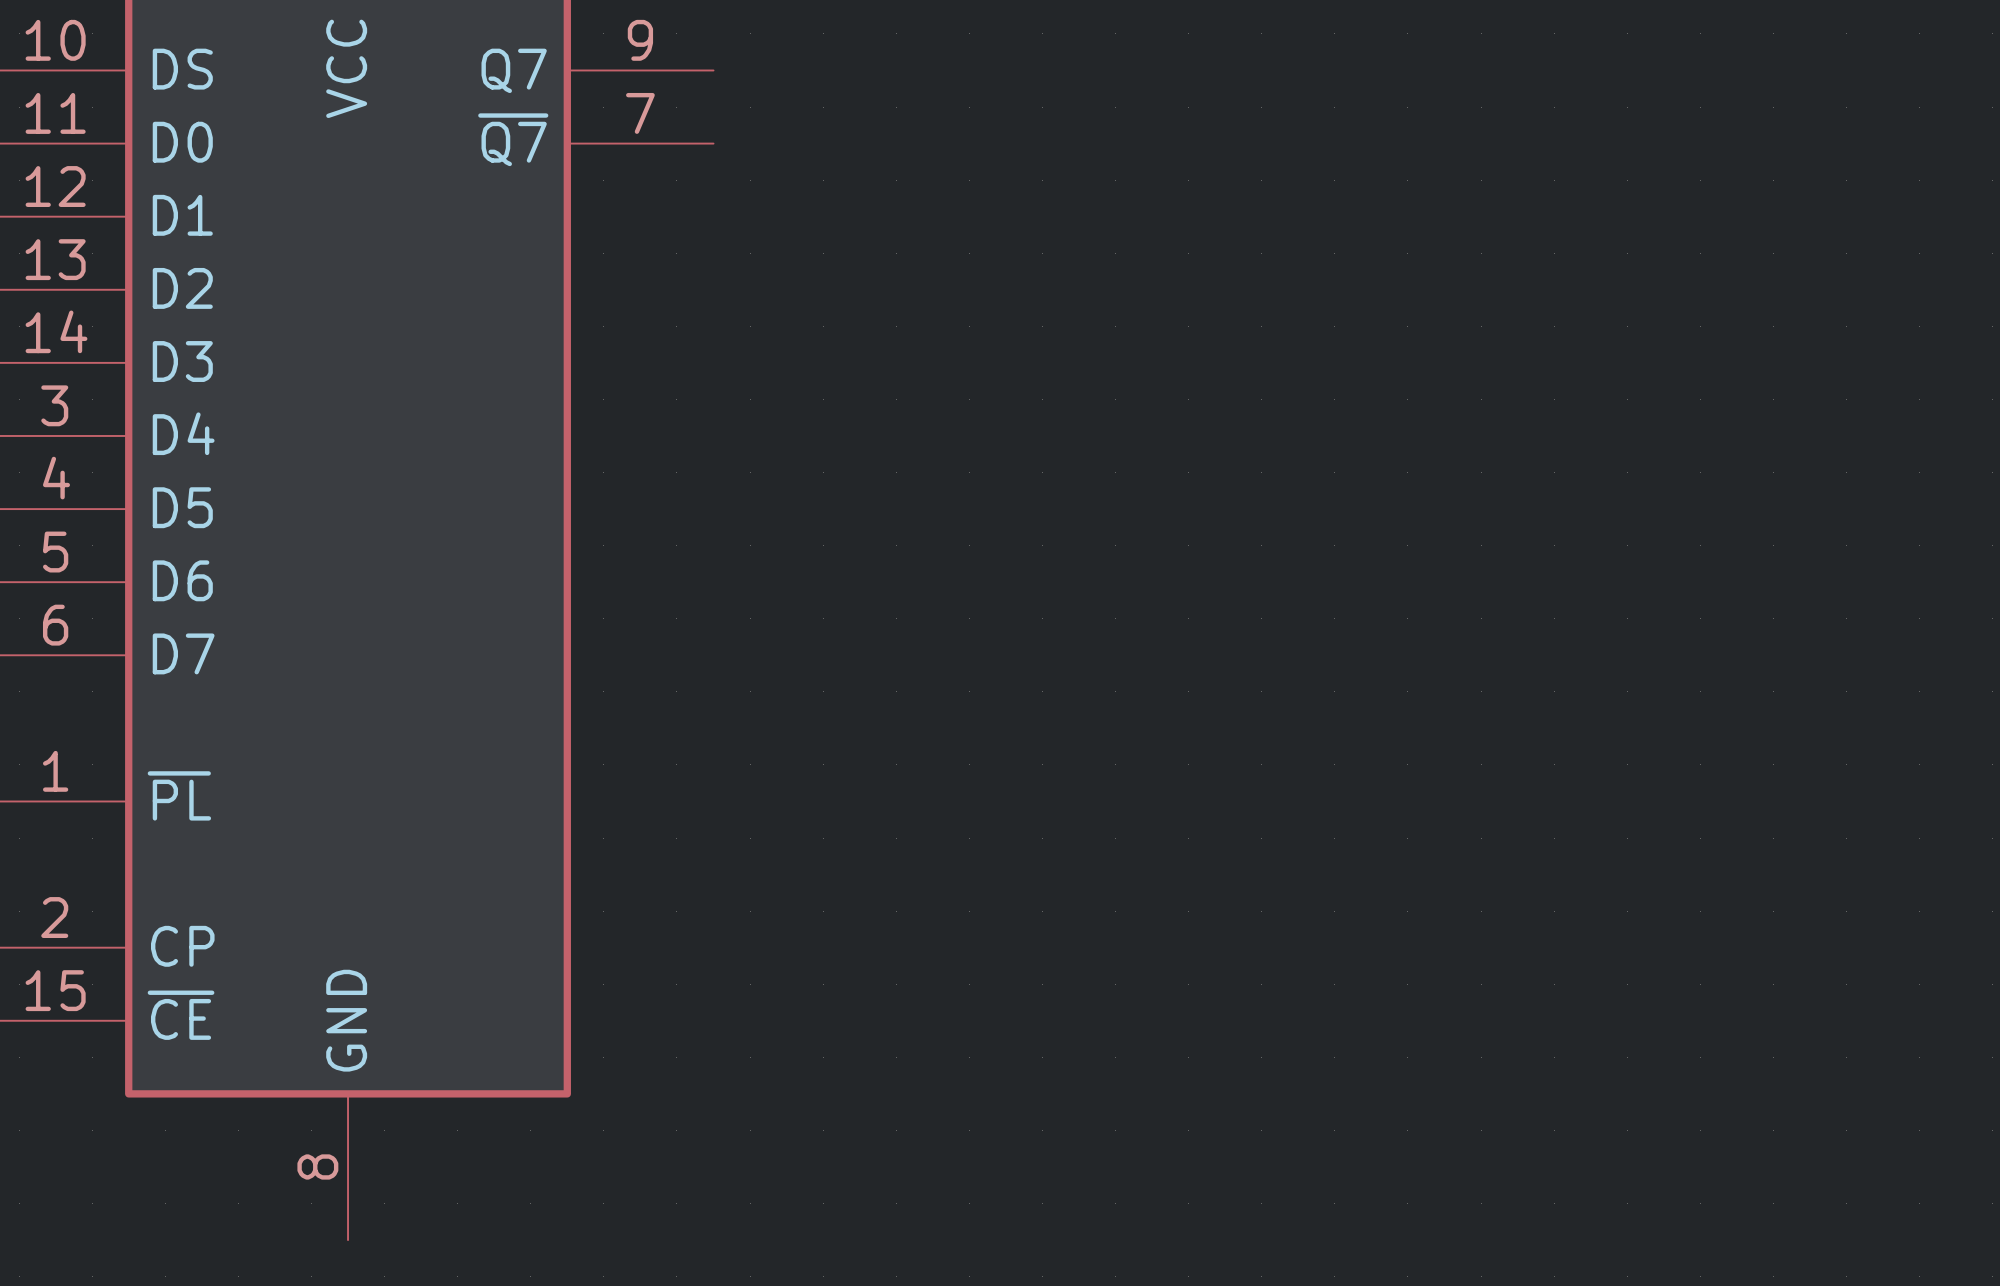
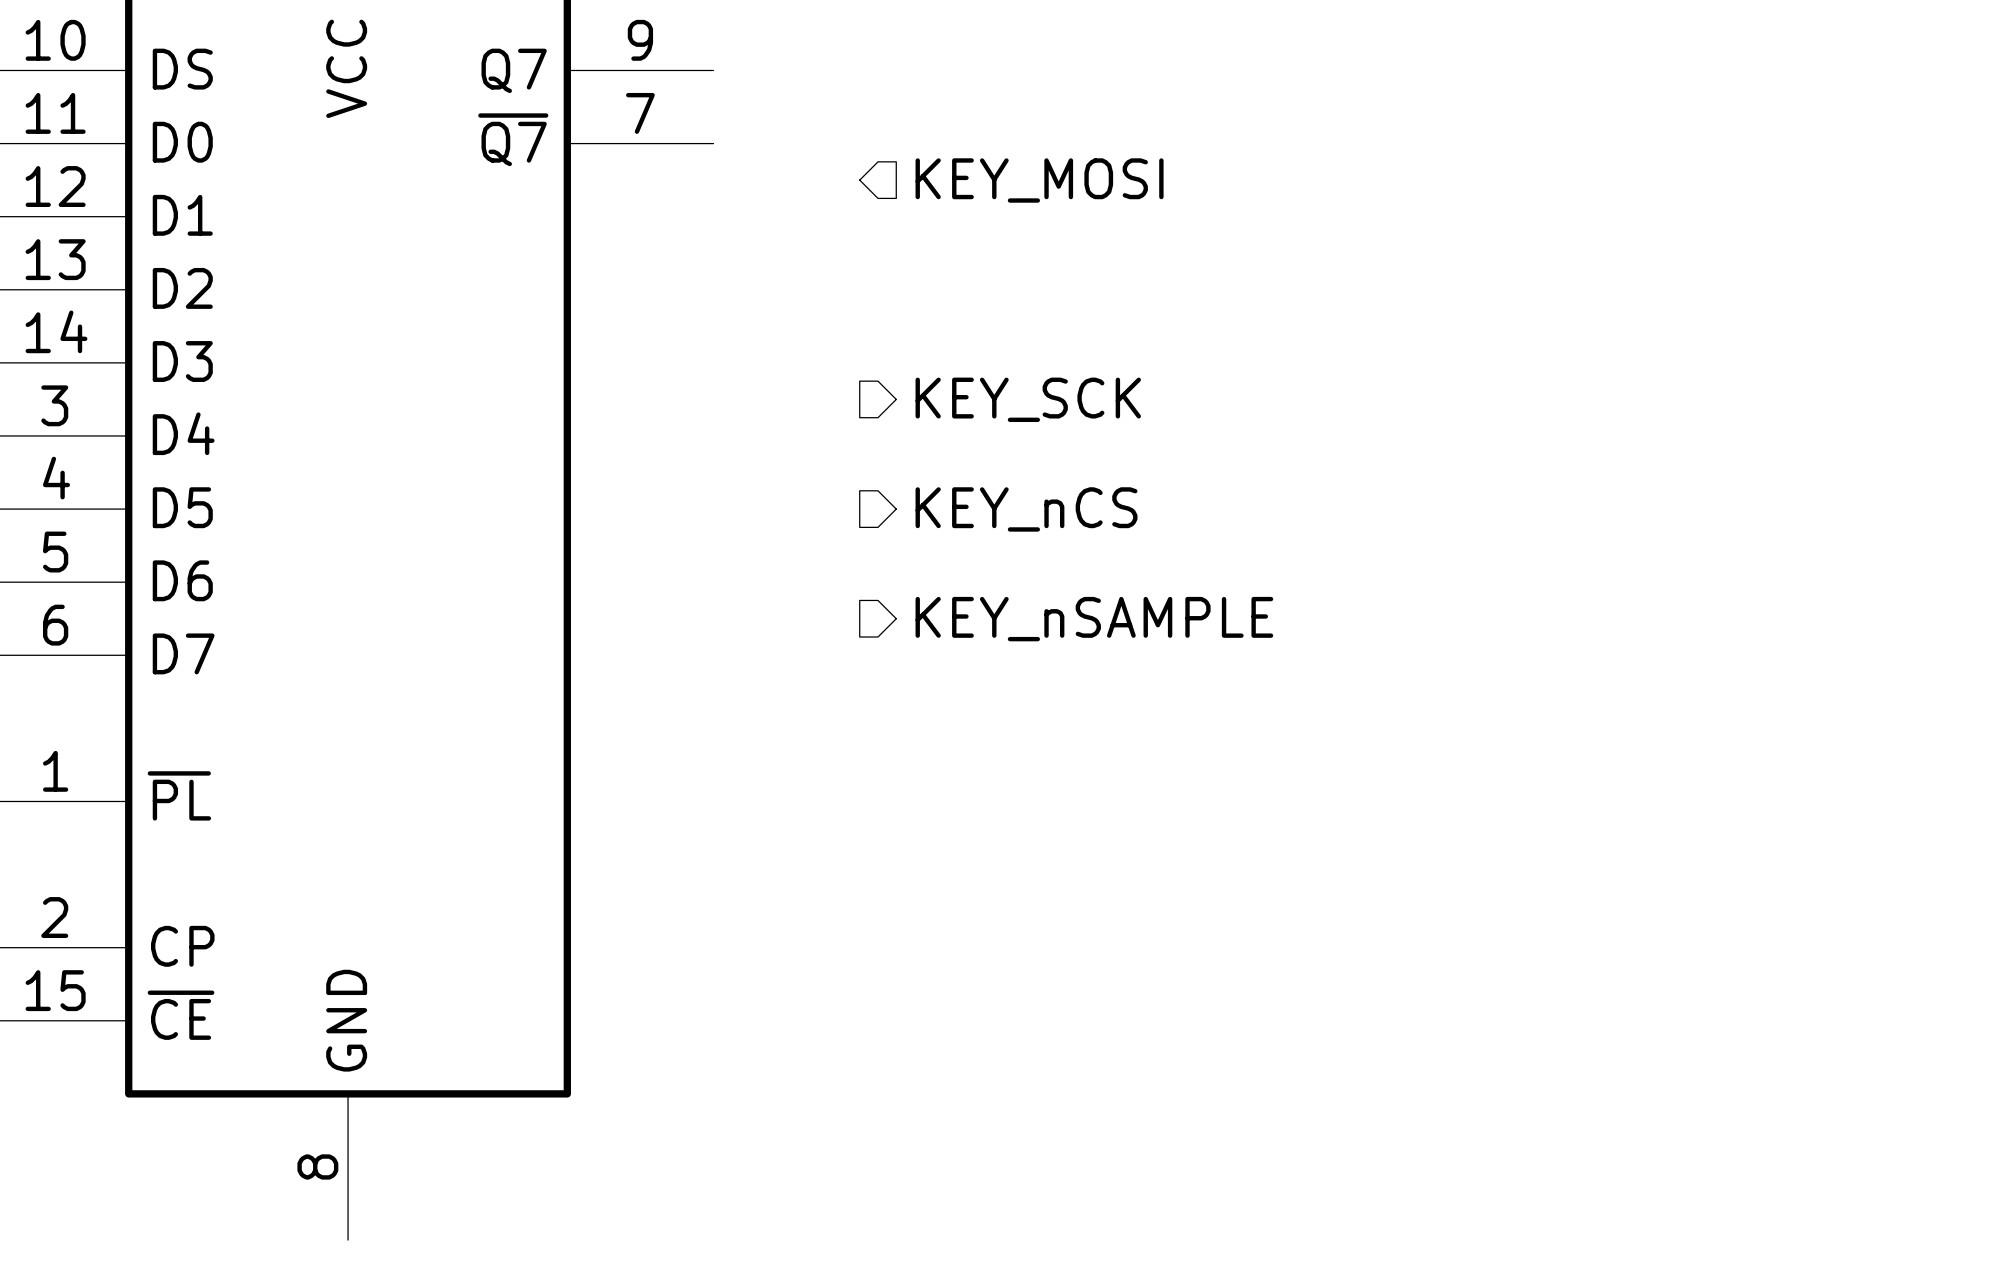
hierarchical label: none -> KEY_MOSI (1039, 180)
hierarchical label: none -> KEY_SCK (1028, 399)
hierarchical label: none -> KEY_nCS (1026, 509)
hierarchical label: none -> KEY_nSAMPLE (1094, 619)

